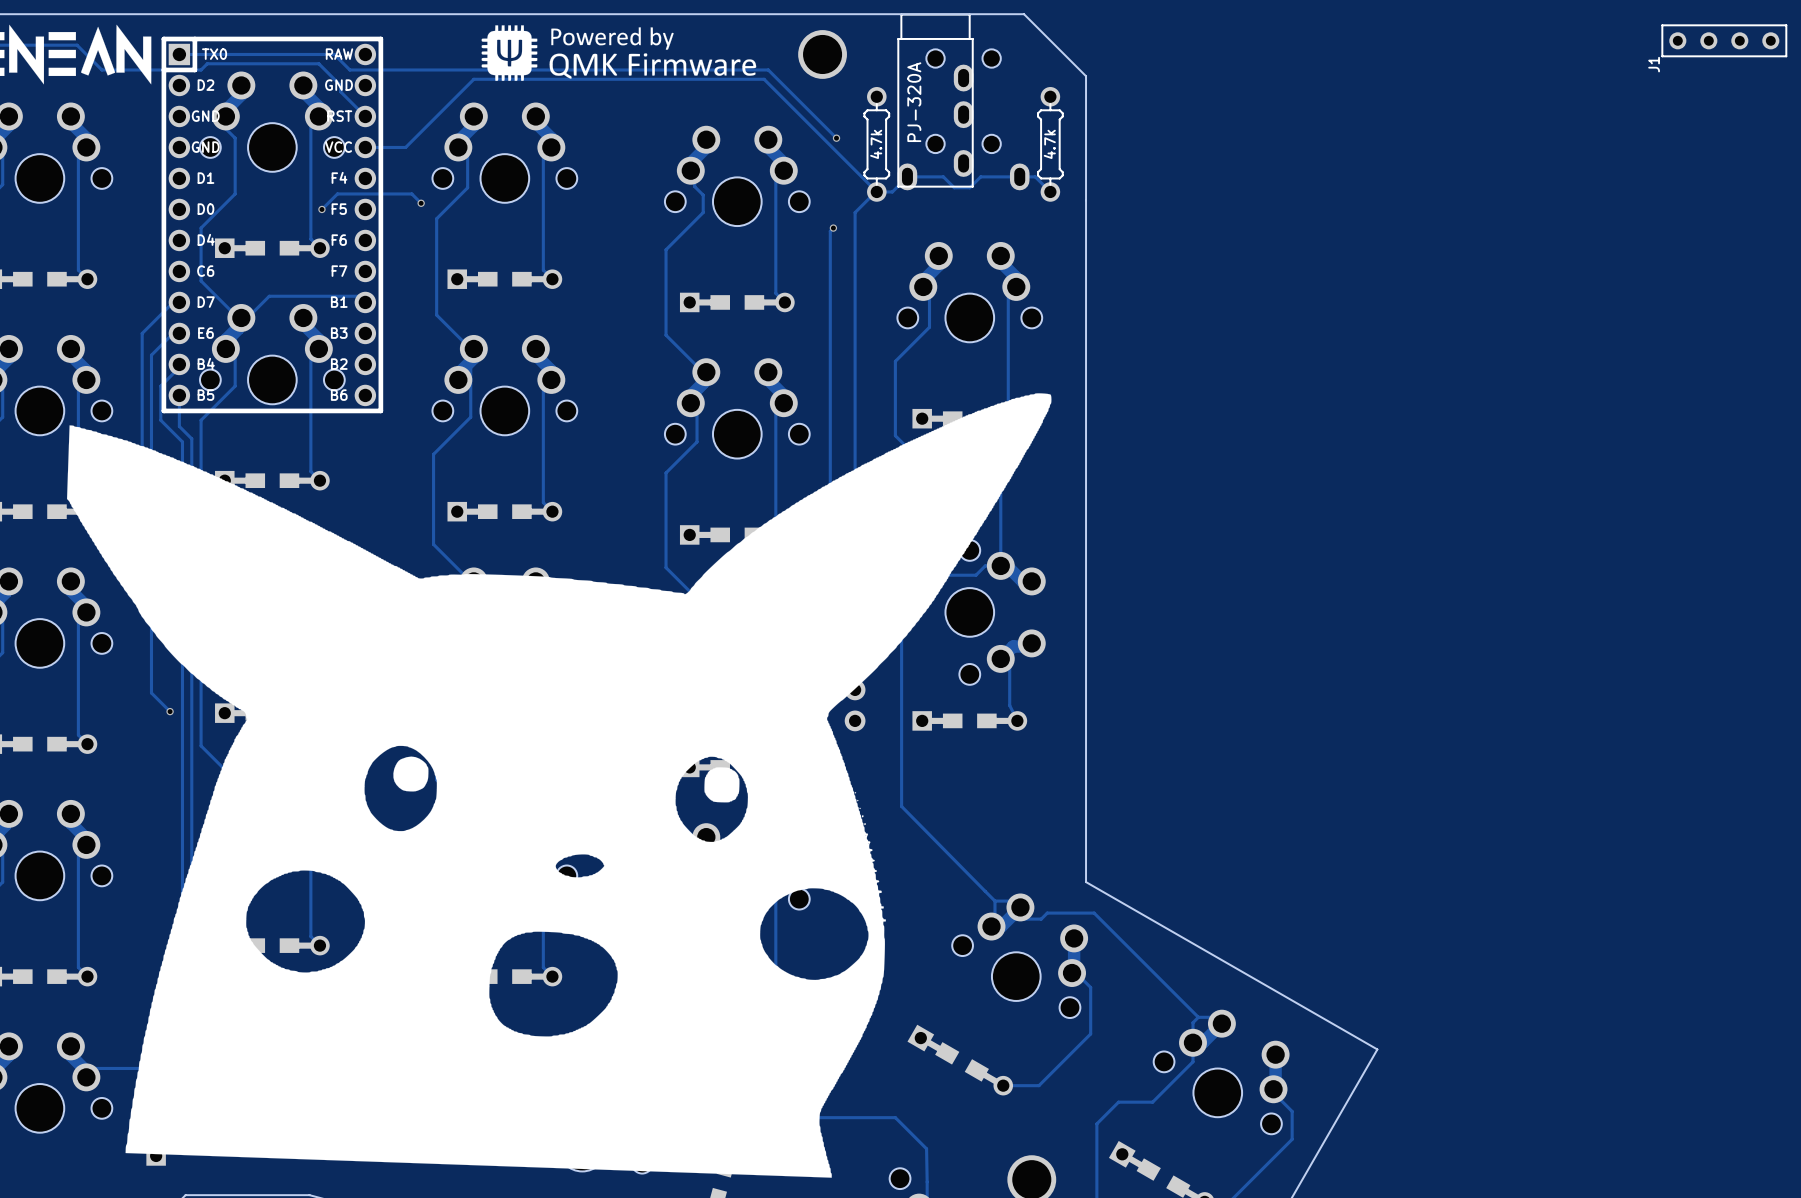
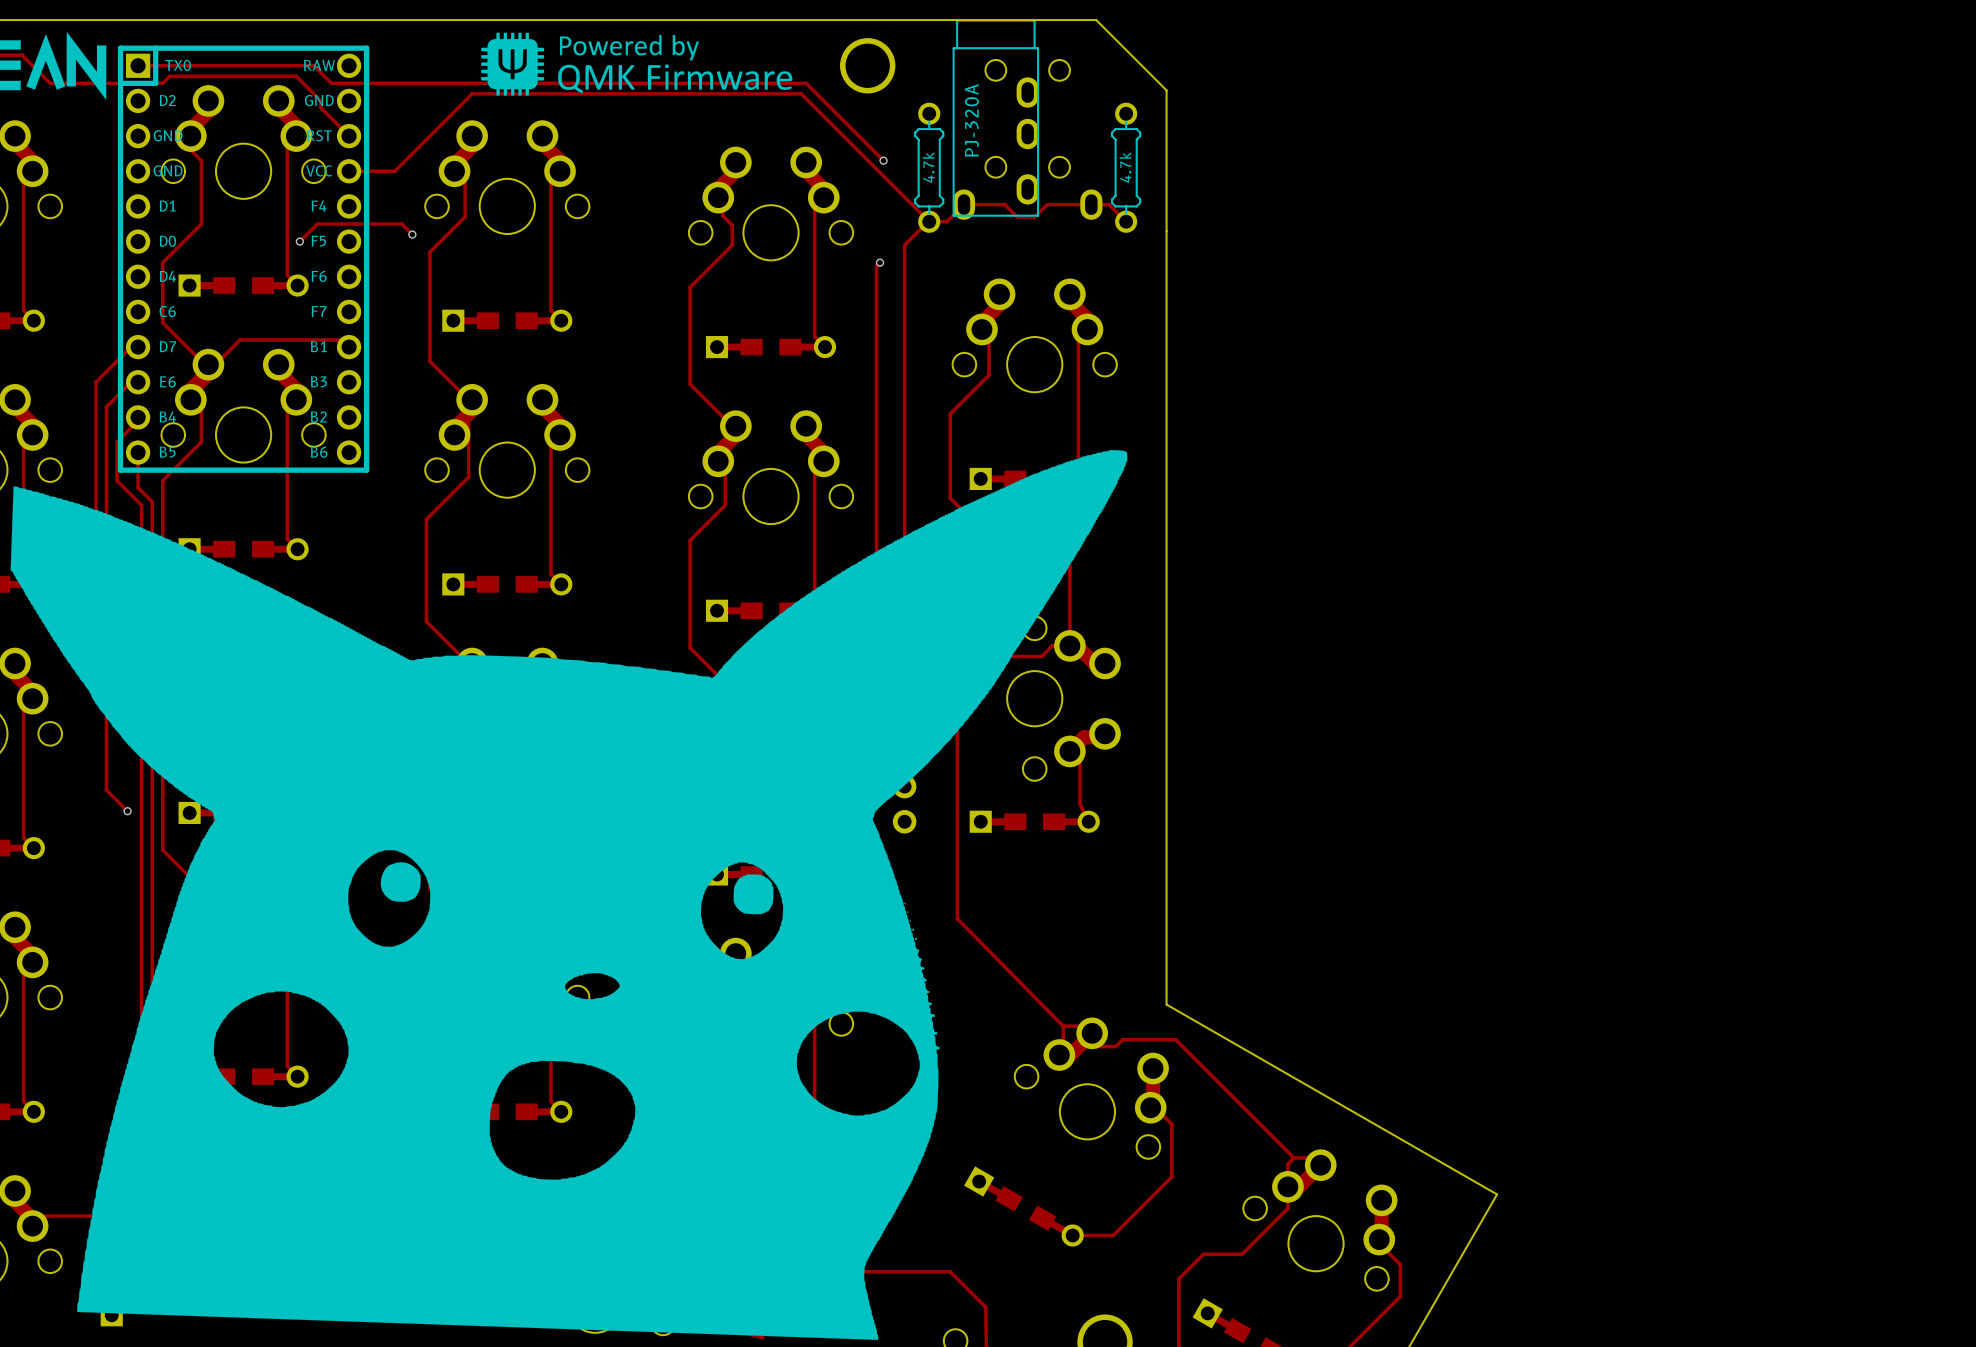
J1: (1724, 40) -> none

